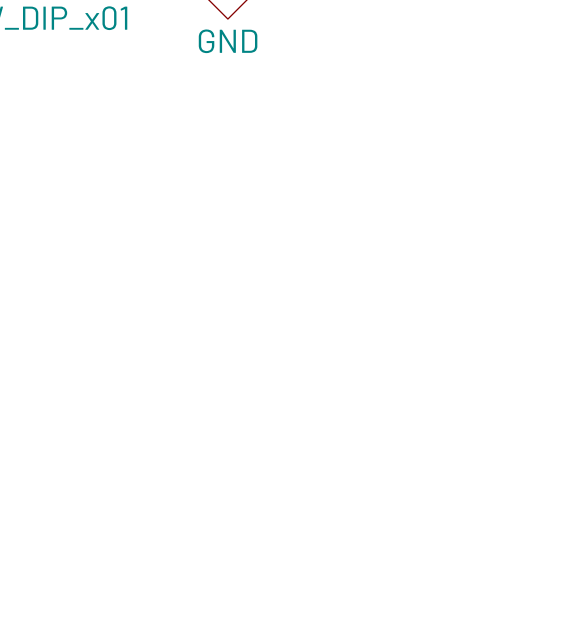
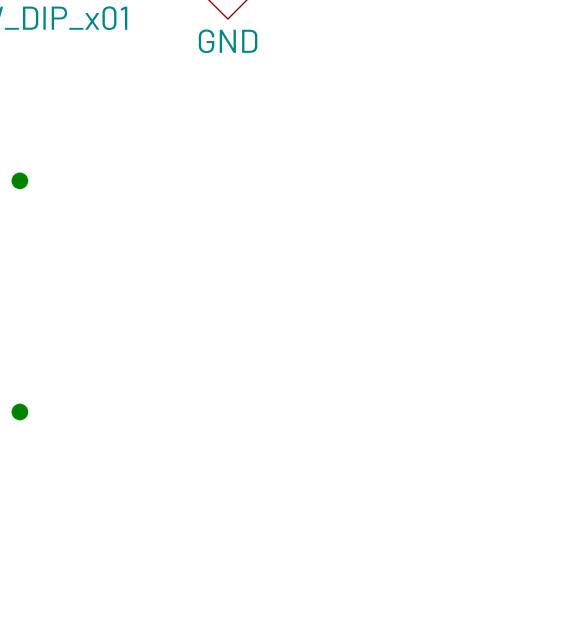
junction: none -> (19, 180)
junction: none -> (19, 411)

